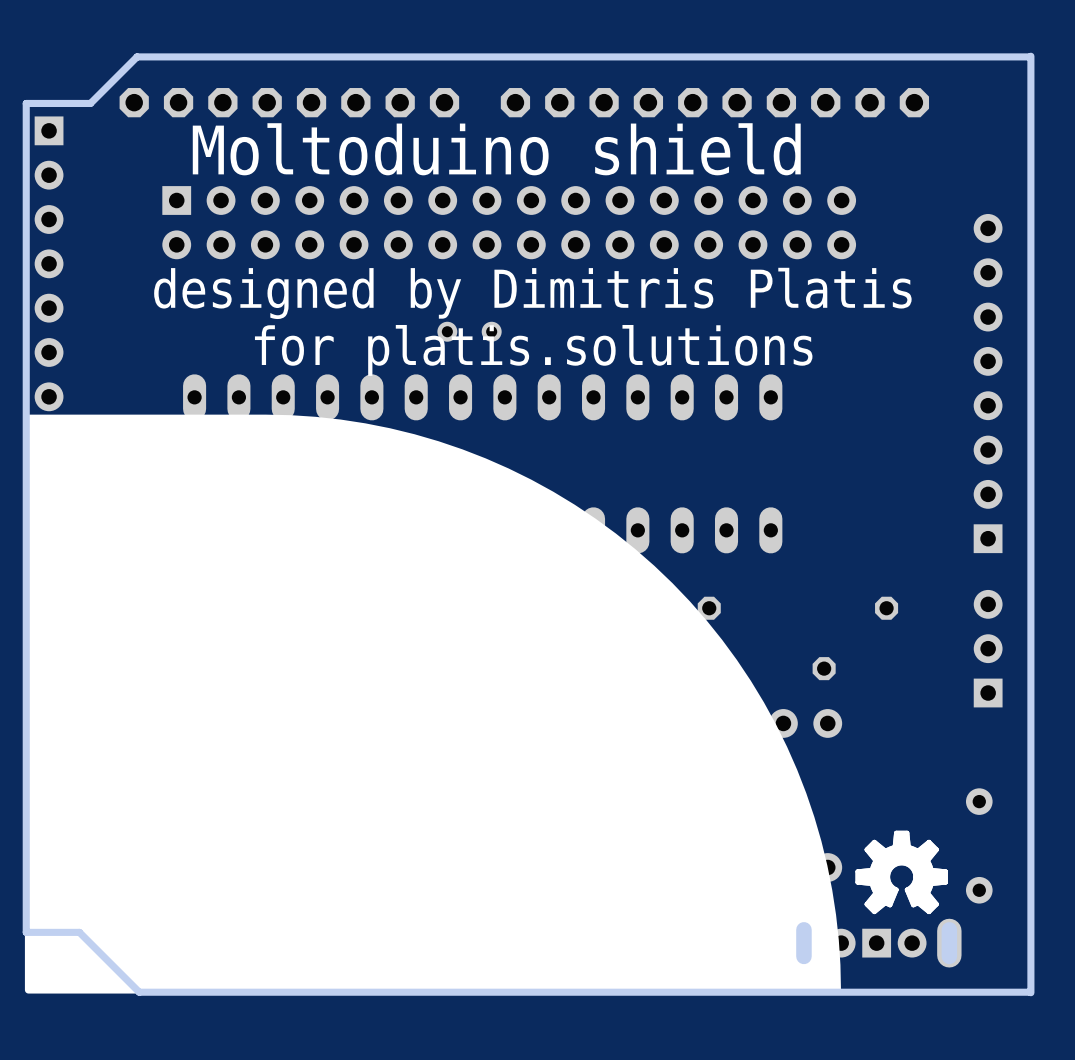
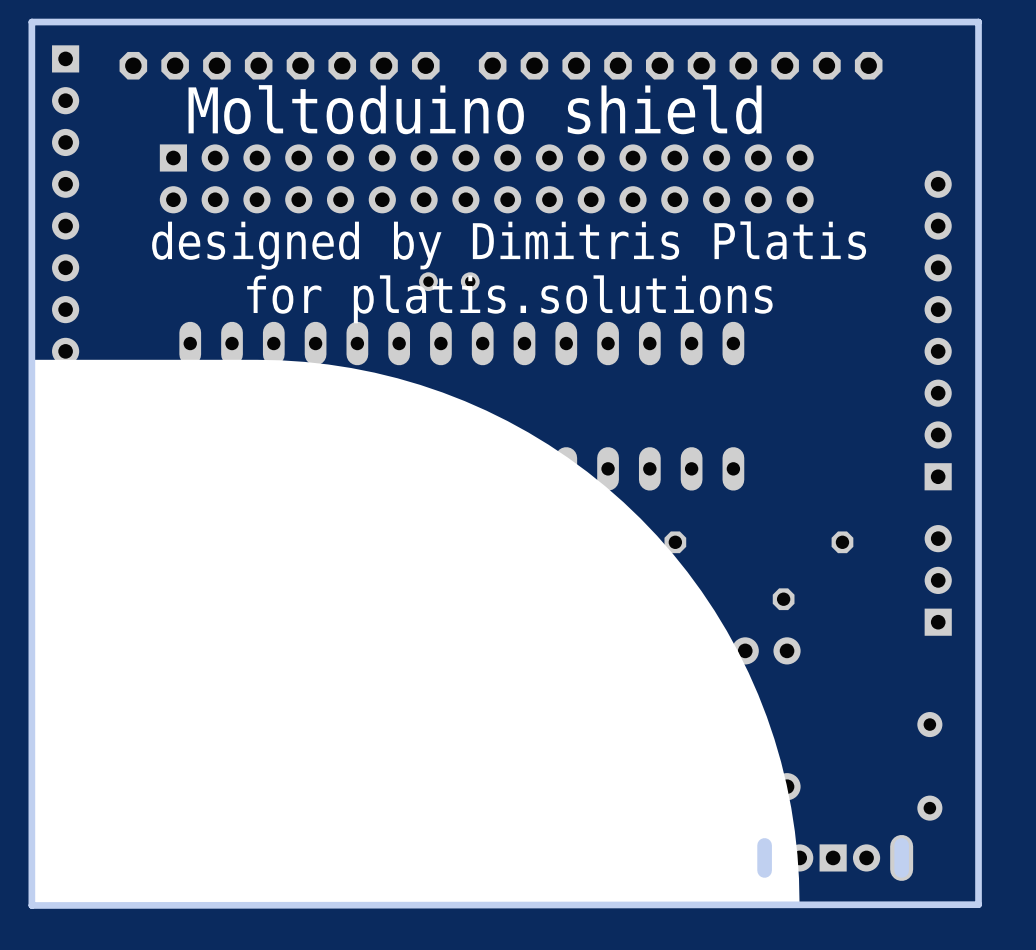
board edge: (1030, 56) (137, 56) (90, 103) (26, 103) (26, 932) (79, 932) (139, 992) (1030, 992) -> none
board edge: none -> (978, 22) (31, 22) (31, 905) (978, 904)
part position: (49, 286) -> (65, 205)
drawing: [855, 830, 948, 915] -> none

